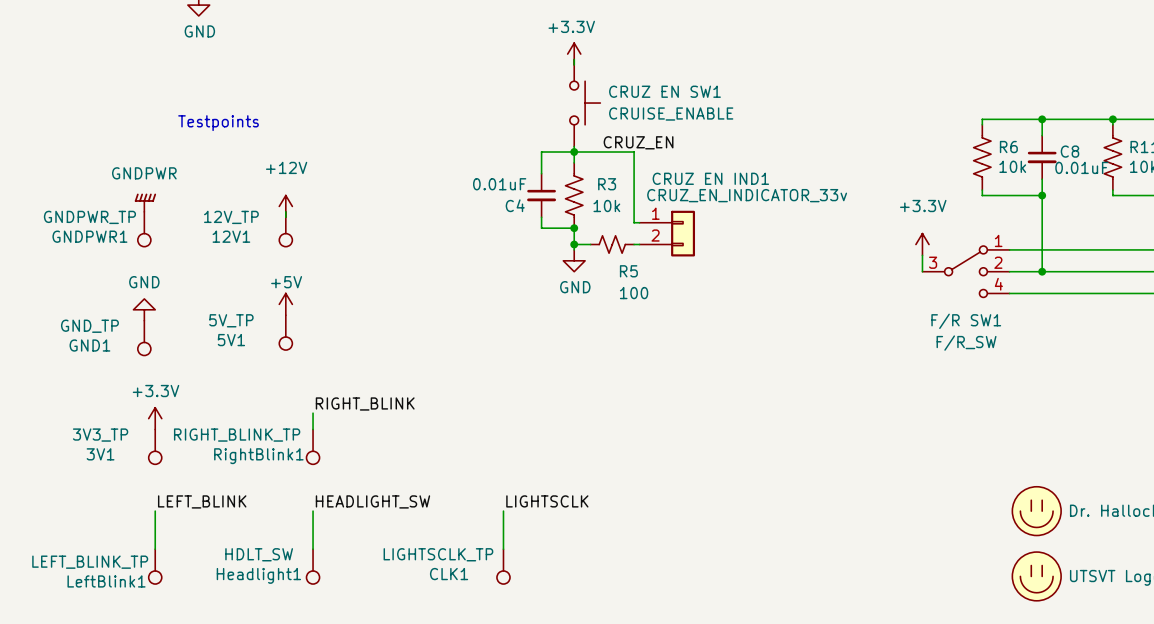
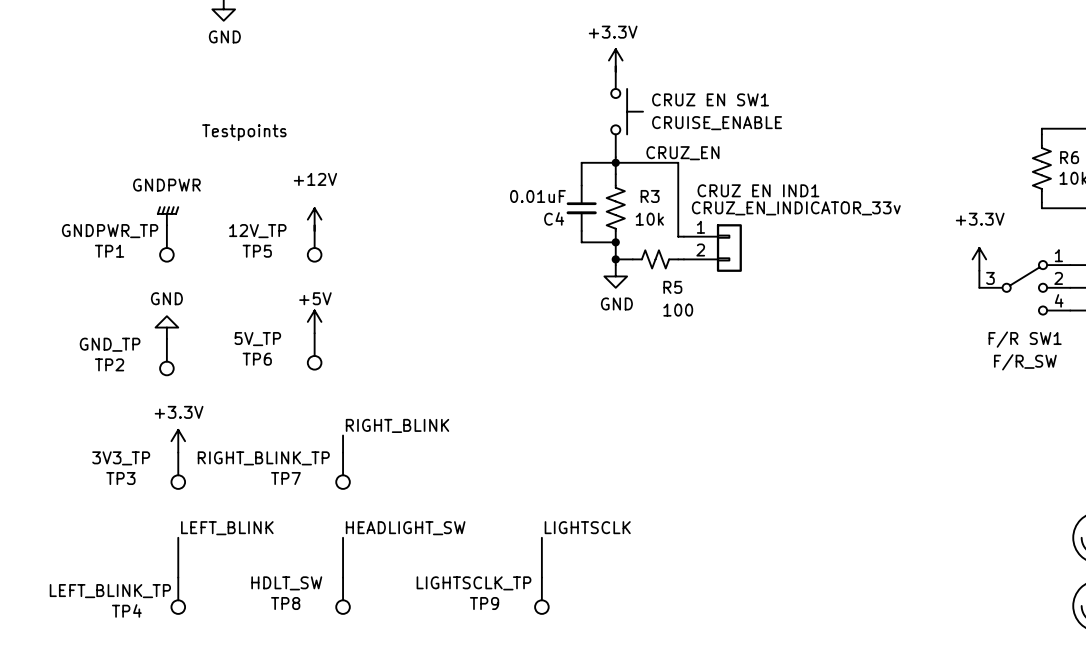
GNDPWR1 name: GNDPWR1 (89, 236) -> TP1 (109, 251)
12V1 name: 12V1 (231, 236) -> TP5 (257, 251)
5V1 name: 5V1 (231, 340) -> TP6 (257, 359)
GND1 name: GND1 (89, 345) -> TP2 (109, 364)
3V1 name: 3V1 (100, 454) -> TP3 (120, 478)
RightBlink1 name: RightBlink1 (258, 456) -> TP7 (285, 478)
CLK1 name: CLK1 (449, 574) -> TP9 (484, 603)
Headlight1 name: Headlight1 (258, 575) -> TP8 (285, 603)
LeftBlink1 name: LeftBlink1 (106, 581) -> TP4 (126, 610)

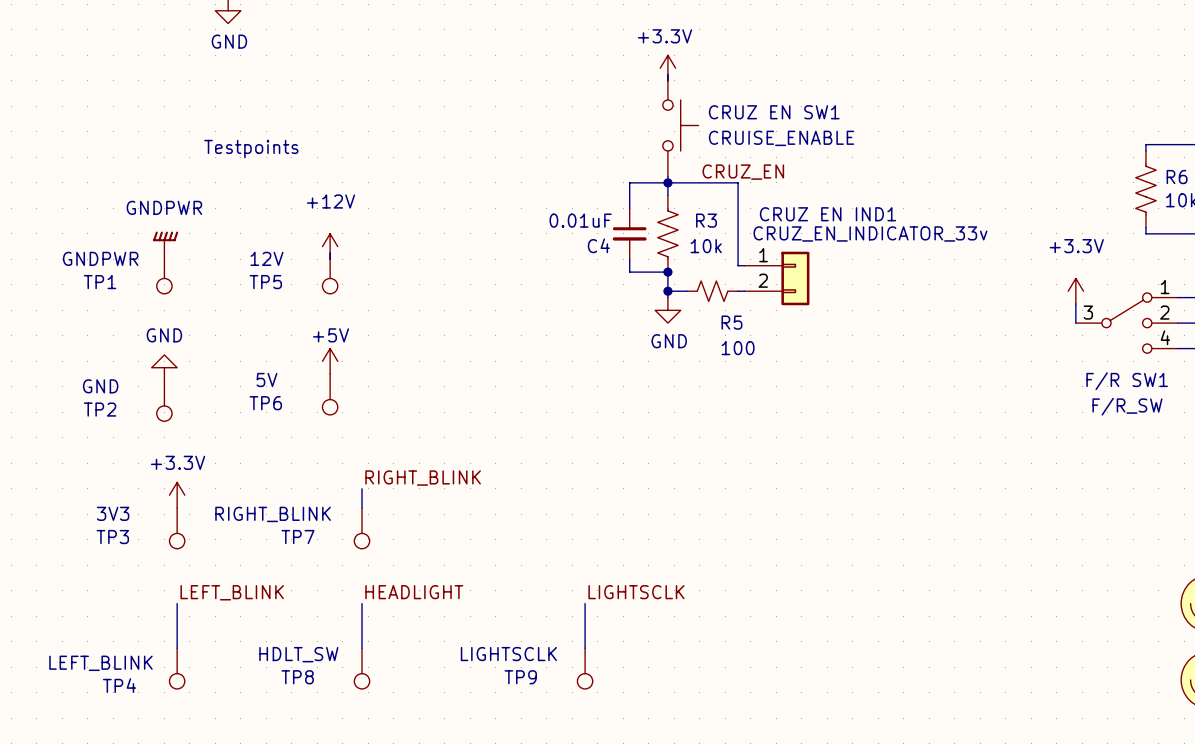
TP1 value: GNDPWR_TP (110, 231) -> GNDPWR (100, 258)
TP5 value: 12V_TP (257, 231) -> 12V (266, 258)
TP6 value: 5V_TP (257, 339) -> 5V (266, 379)
TP2 value: GND_TP (110, 344) -> GND (100, 386)
TP3 value: 3V3_TP (121, 458) -> 3V3 (113, 513)
TP7 value: RIGHT_BLINK_TP (263, 458) -> RIGHT_BLINK (273, 514)
label: HEADLIGHT_SW (405, 528) -> HEADLIGHT (414, 592)
TP9 value: LIGHTSCLK_TP (473, 583) -> LIGHTSCLK (508, 654)
TP4 value: LEFT_BLINK_TP (110, 591) -> LEFT_BLINK (100, 663)

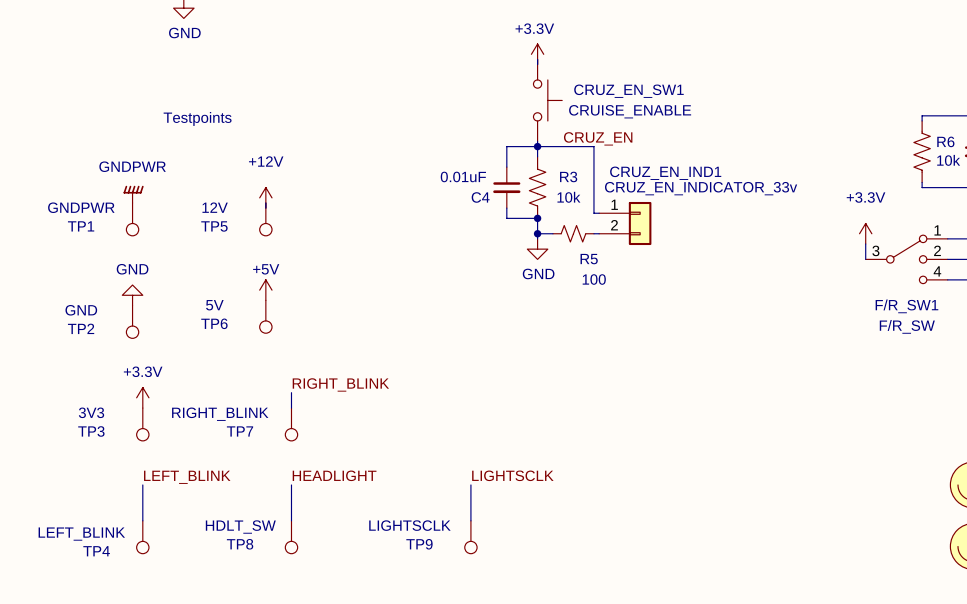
CRUZ EN SW1 name: CRUZ EN SW1 (774, 112) -> CRUZ_EN_SW1 (628, 91)
CRUZ EN IND1 name: CRUZ EN IND1 (827, 214) -> CRUZ_EN_IND1 (665, 173)
F/R SW1 name: F/R SW1 (1127, 381) -> F/R_SW1 (906, 306)

